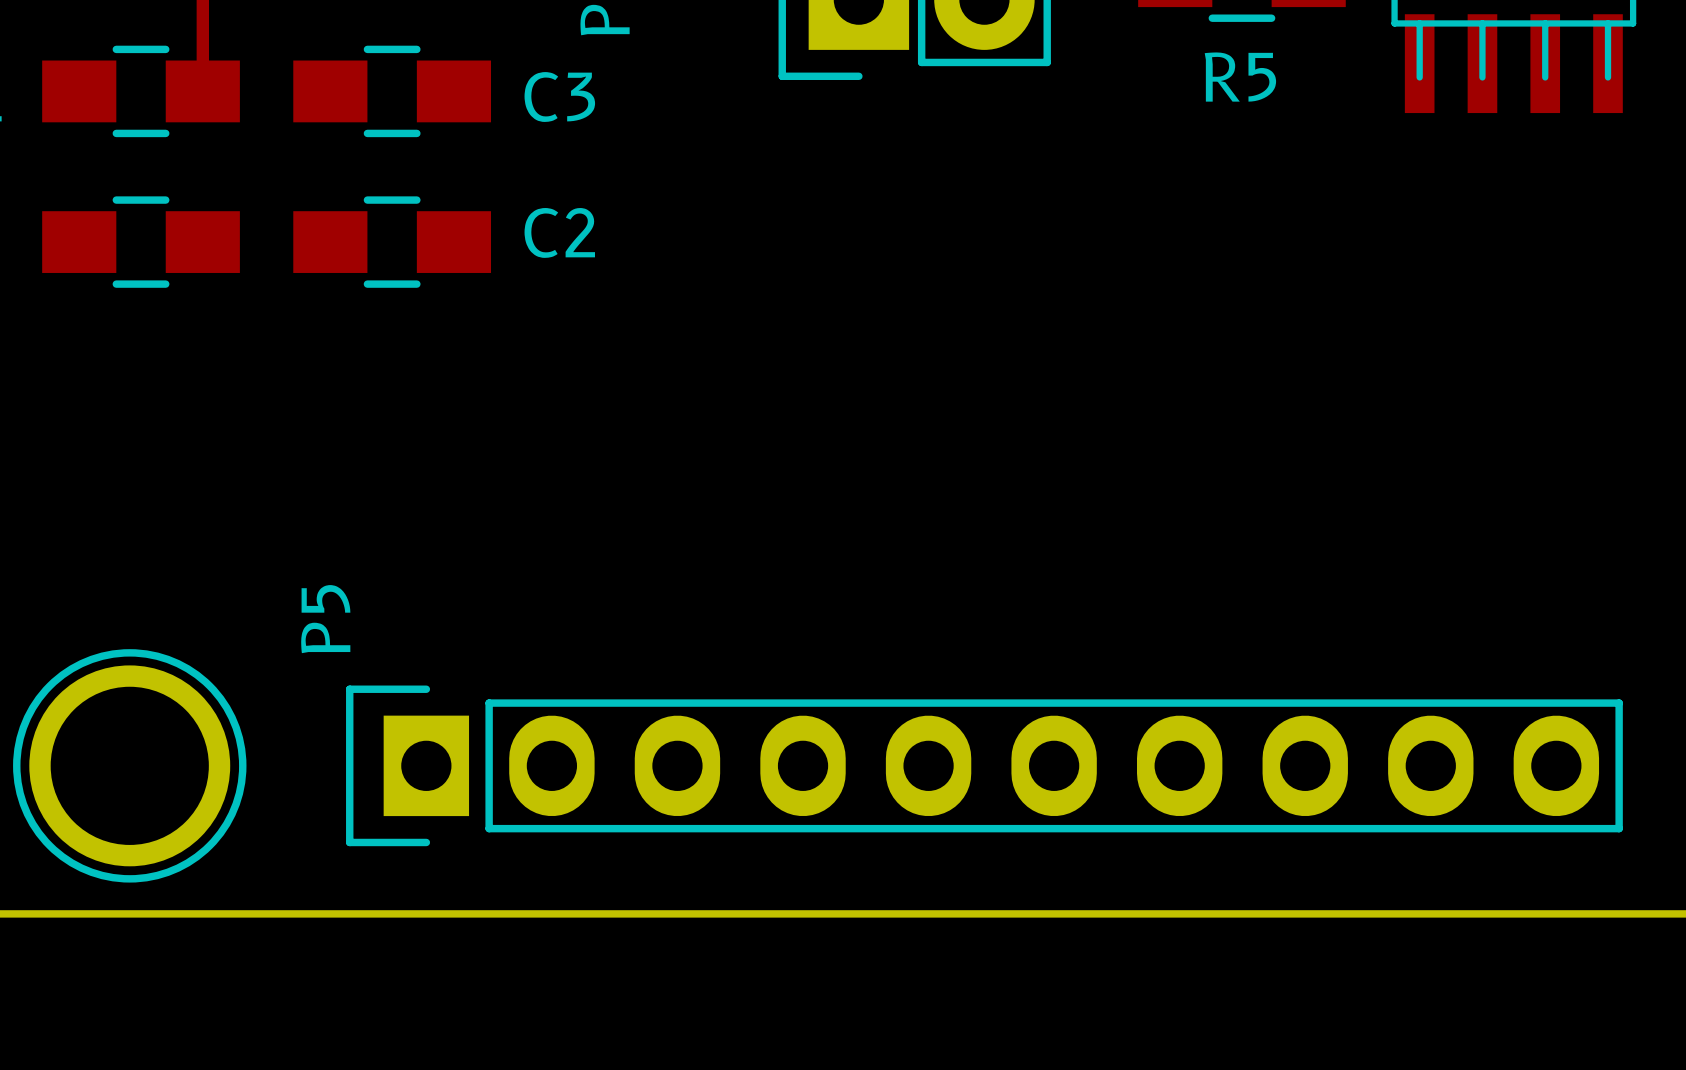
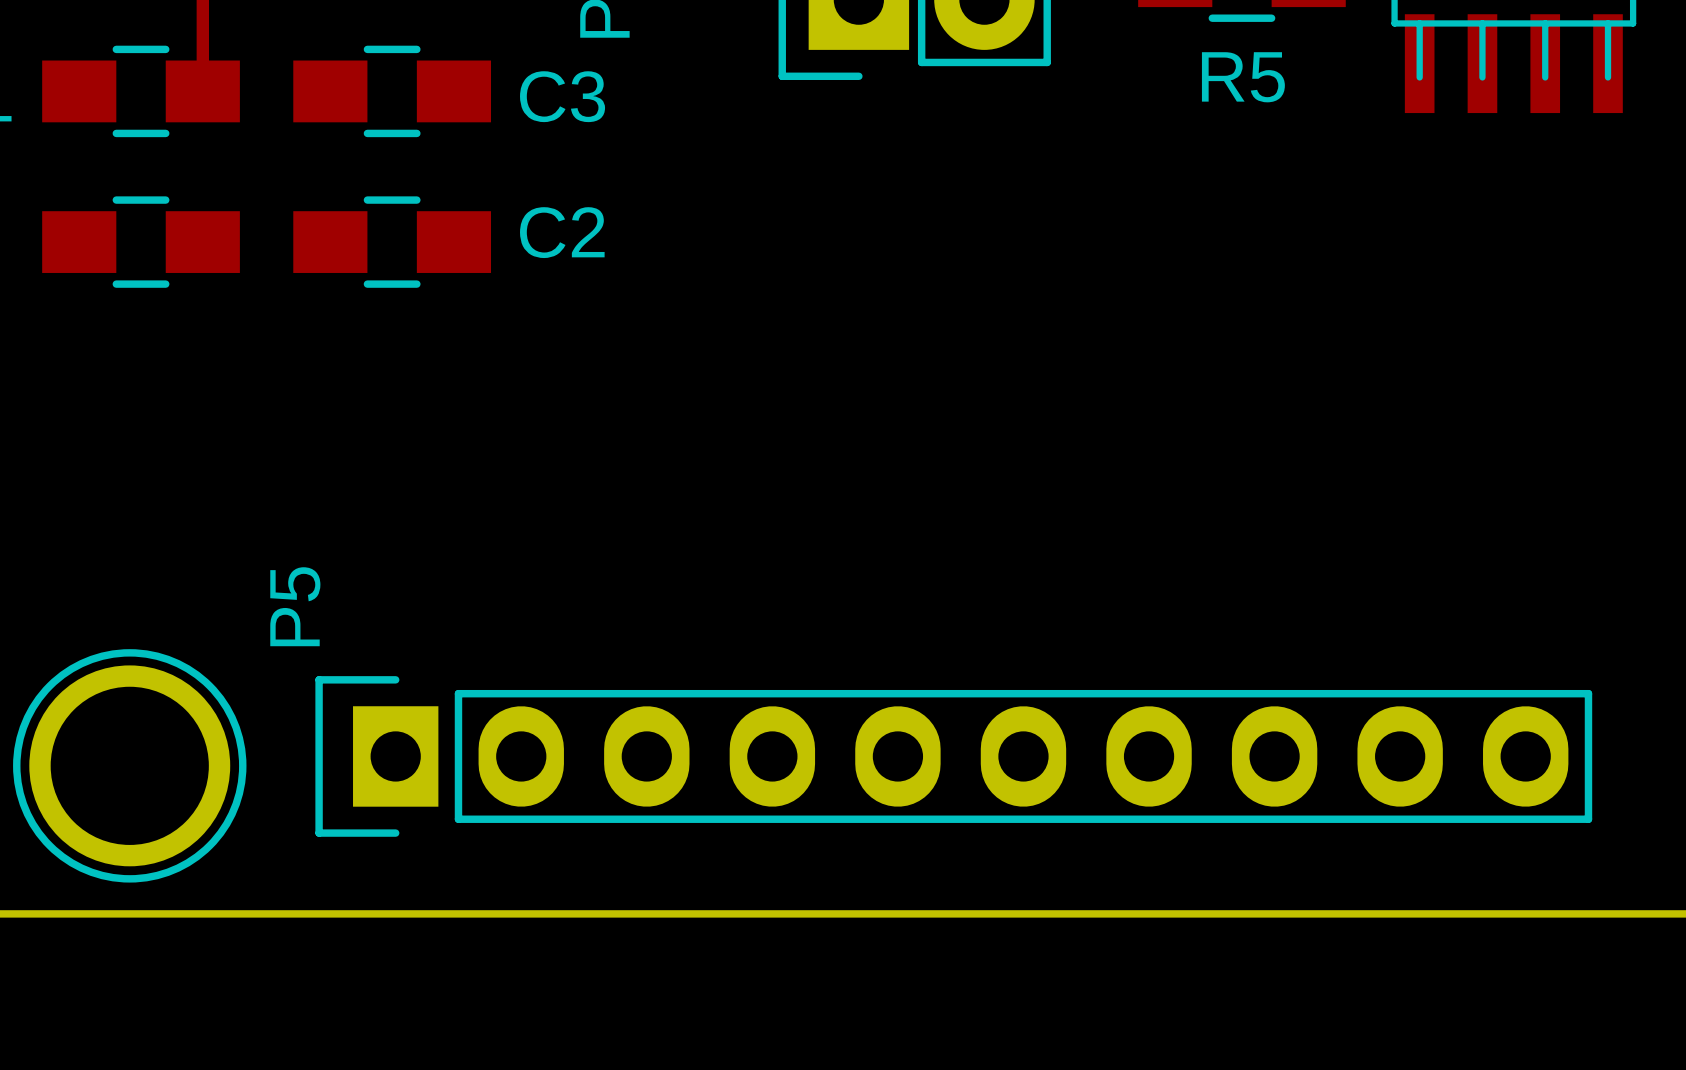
P5 position: (984, 765) -> (953, 756)

